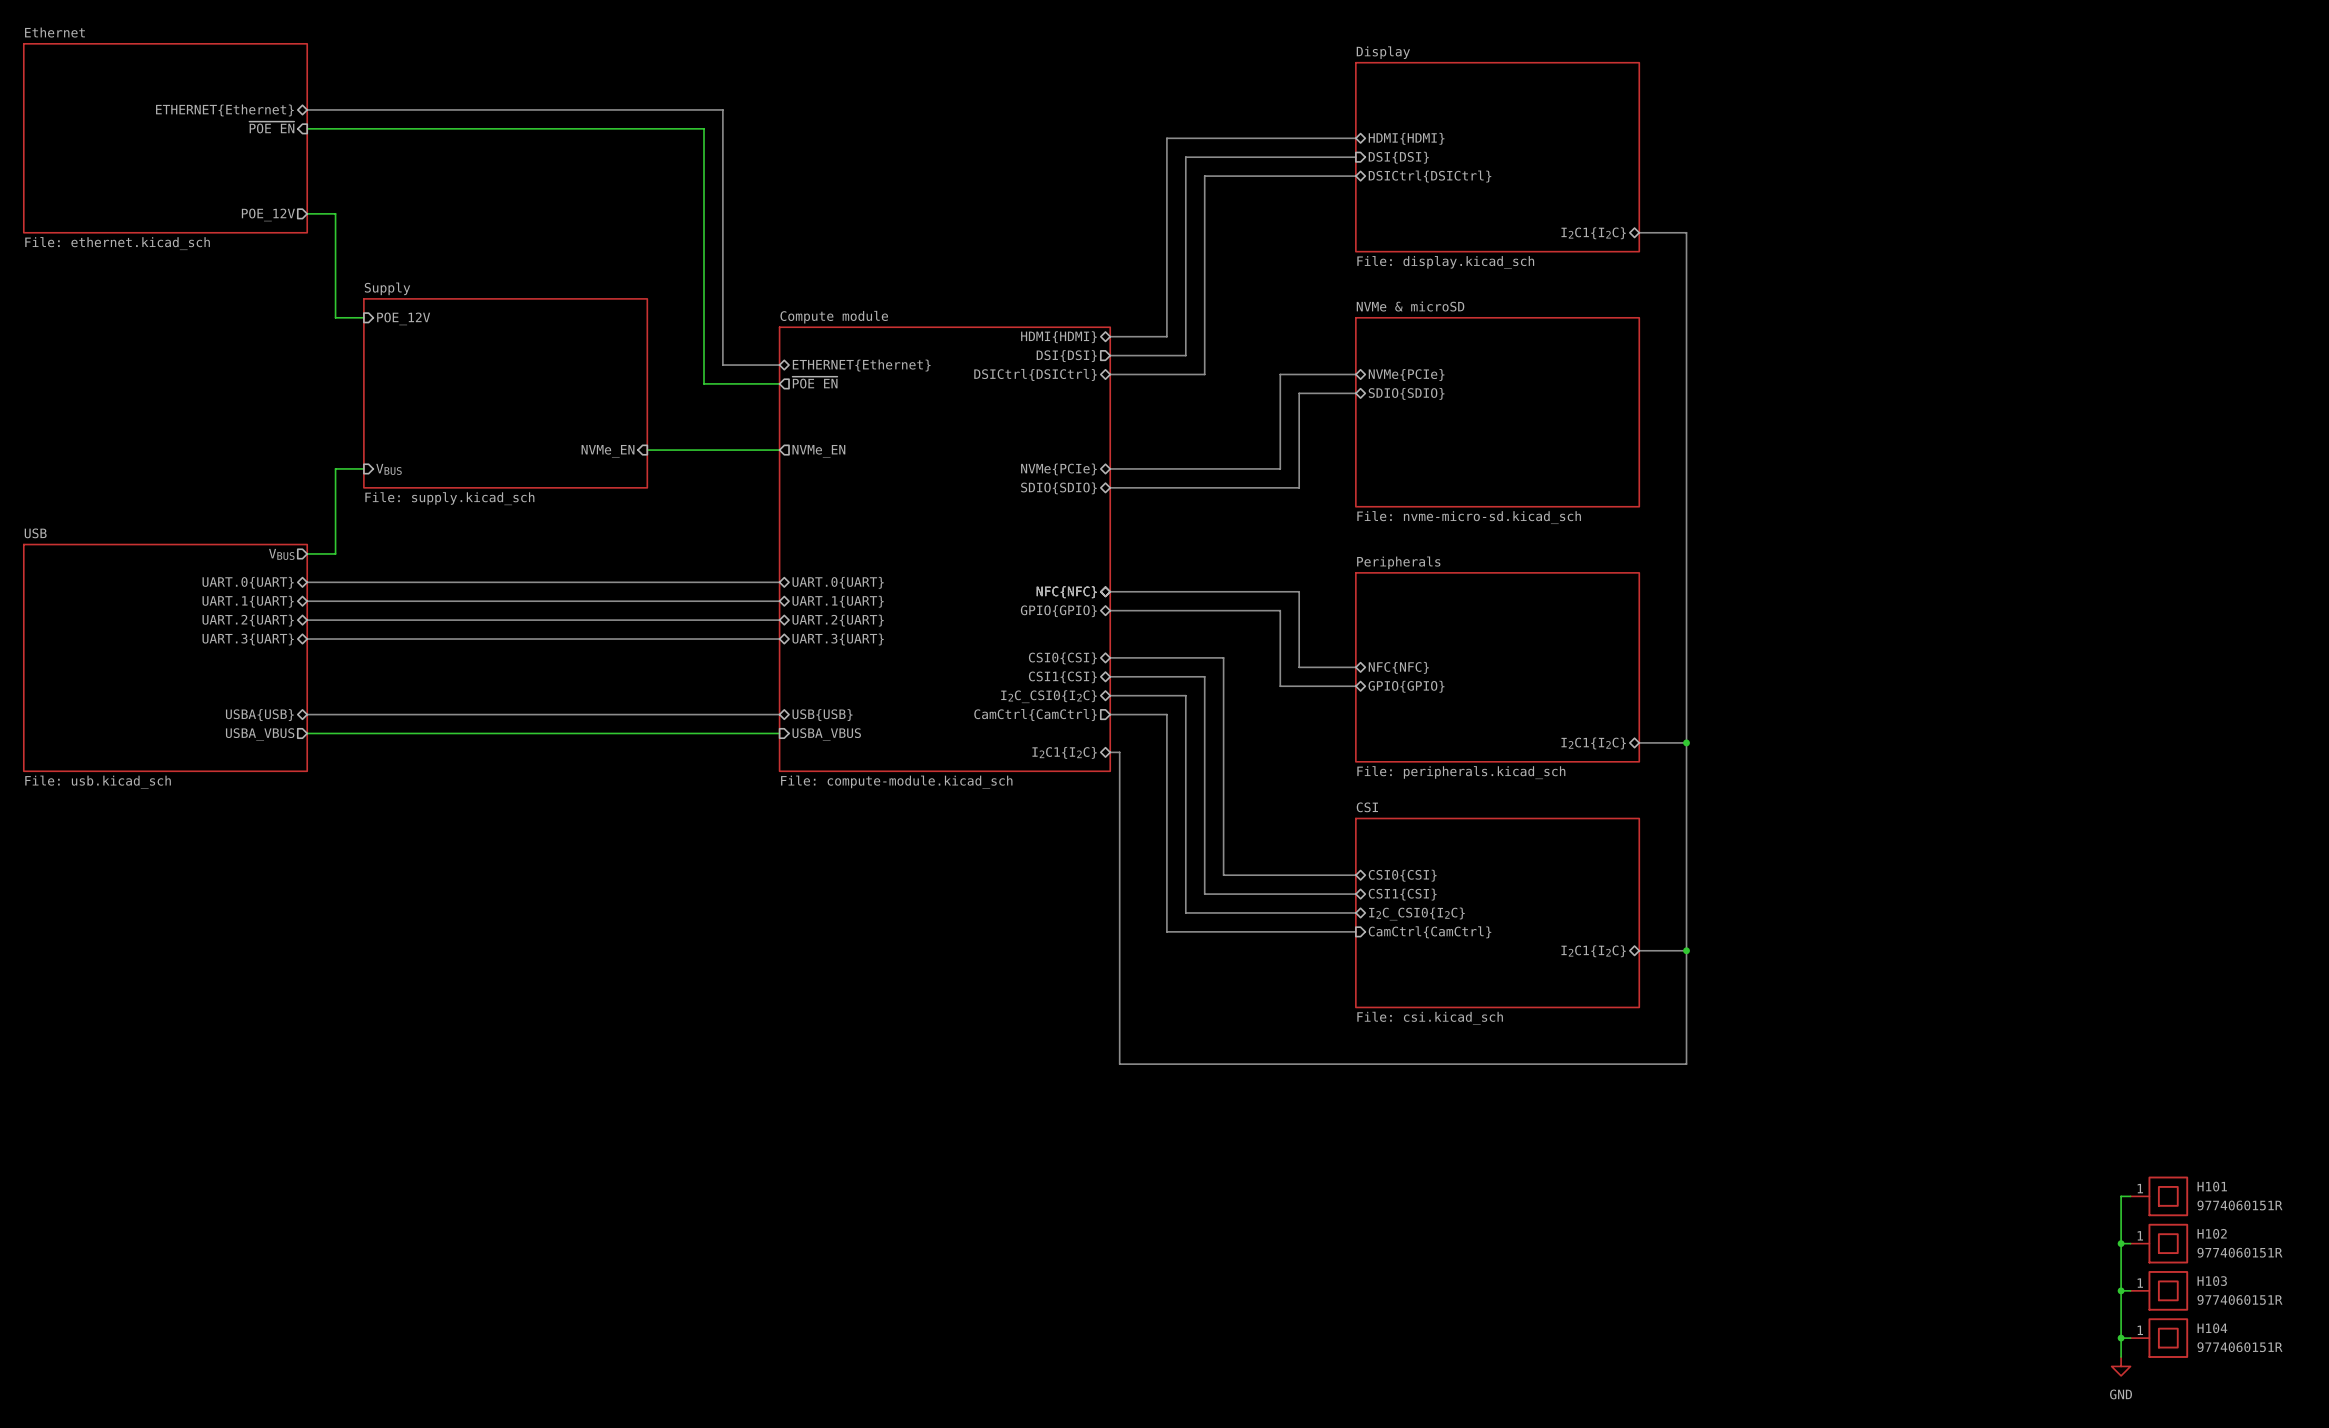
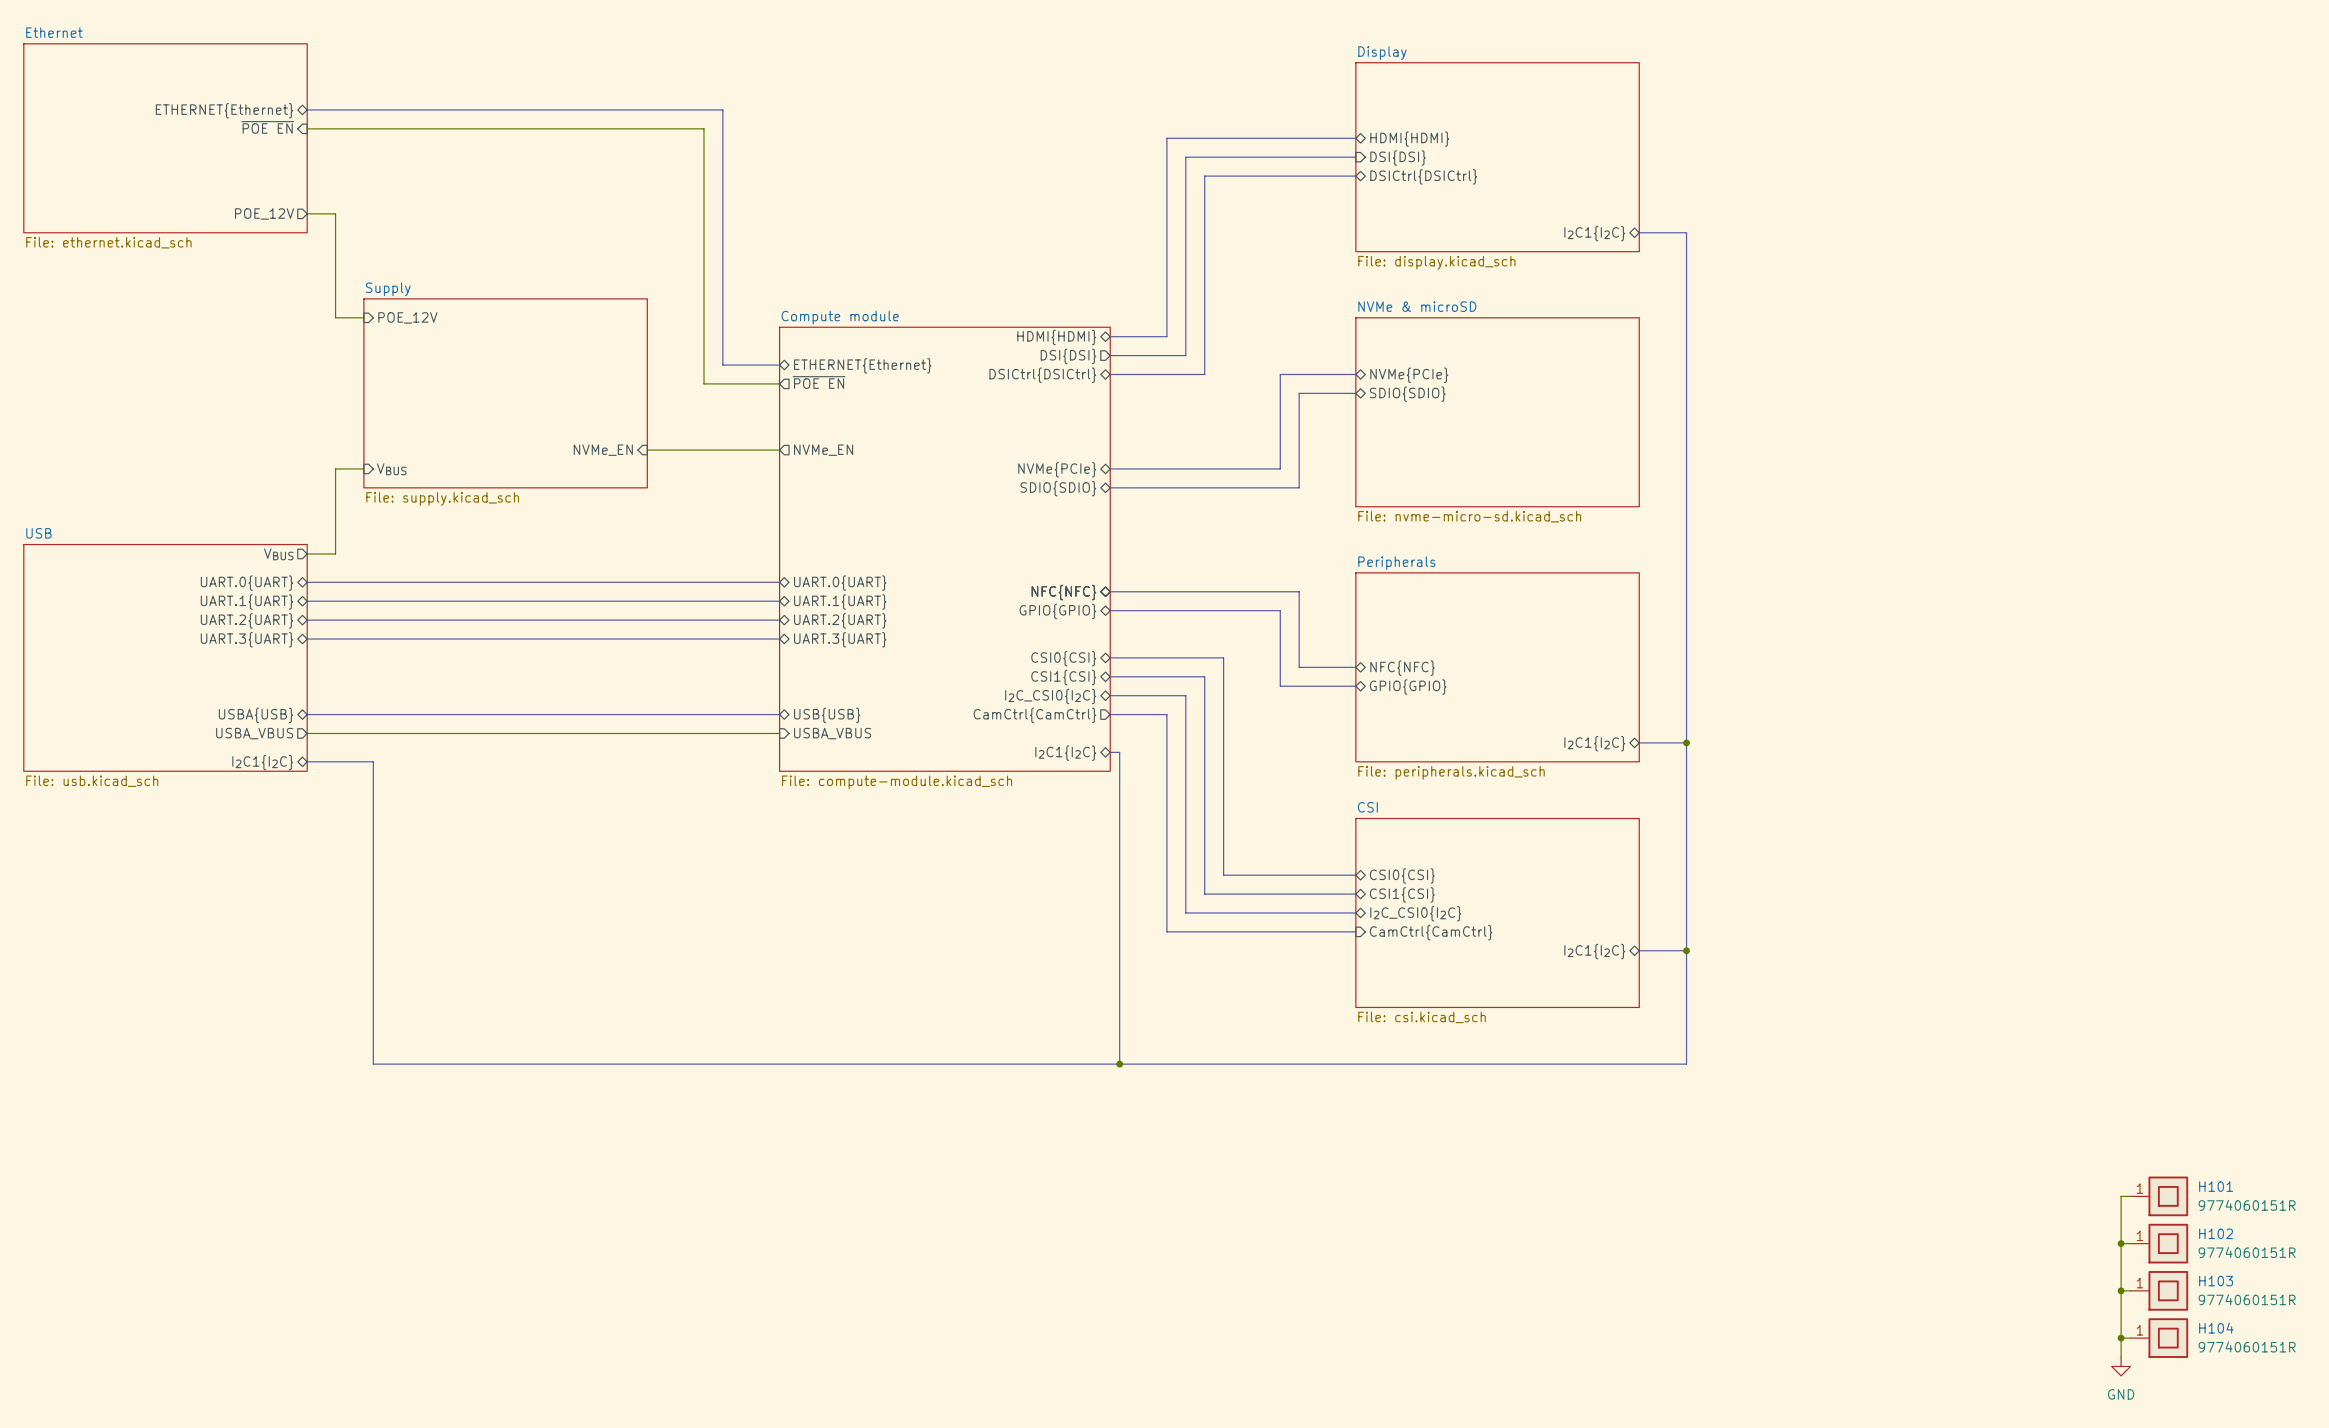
bus: none -> (307, 761) (373, 761) (373, 1064) (1119, 1064)
sheet pin: none -> I2C1{I2C} (262, 762)
junction: none -> (1119, 1064)

